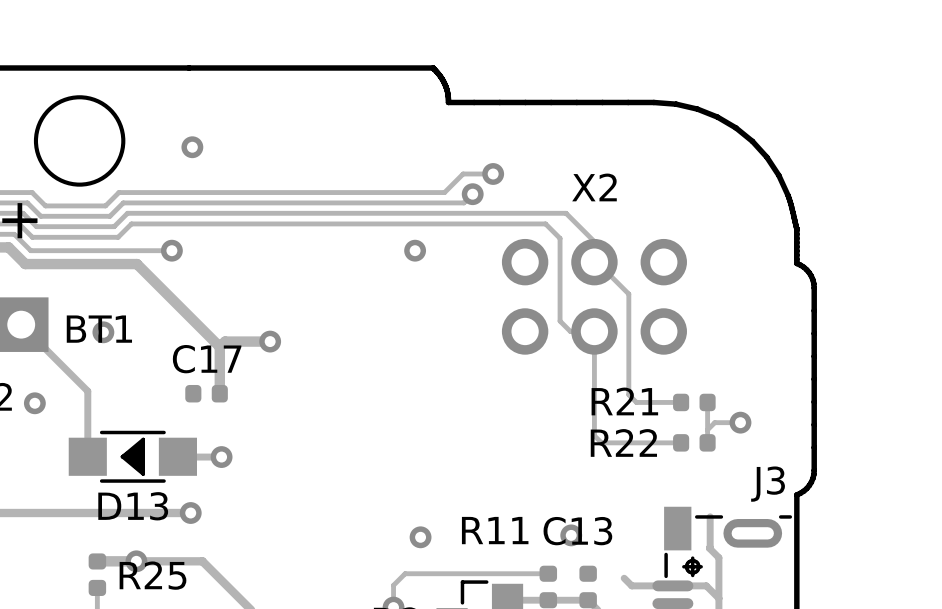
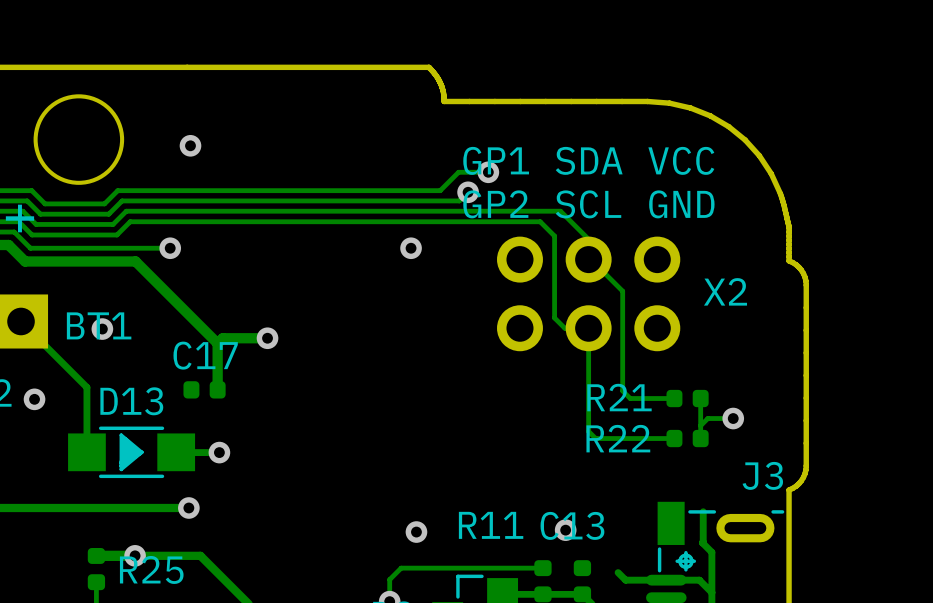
text: none -> GP1 SDA VCC (588, 160)
X2 name position: X2 (594, 187) -> X2 (725, 291)
text: none -> GP2 SCL GND (588, 204)
D13 rotation: 0° (132, 456) -> 180° (131, 452)

